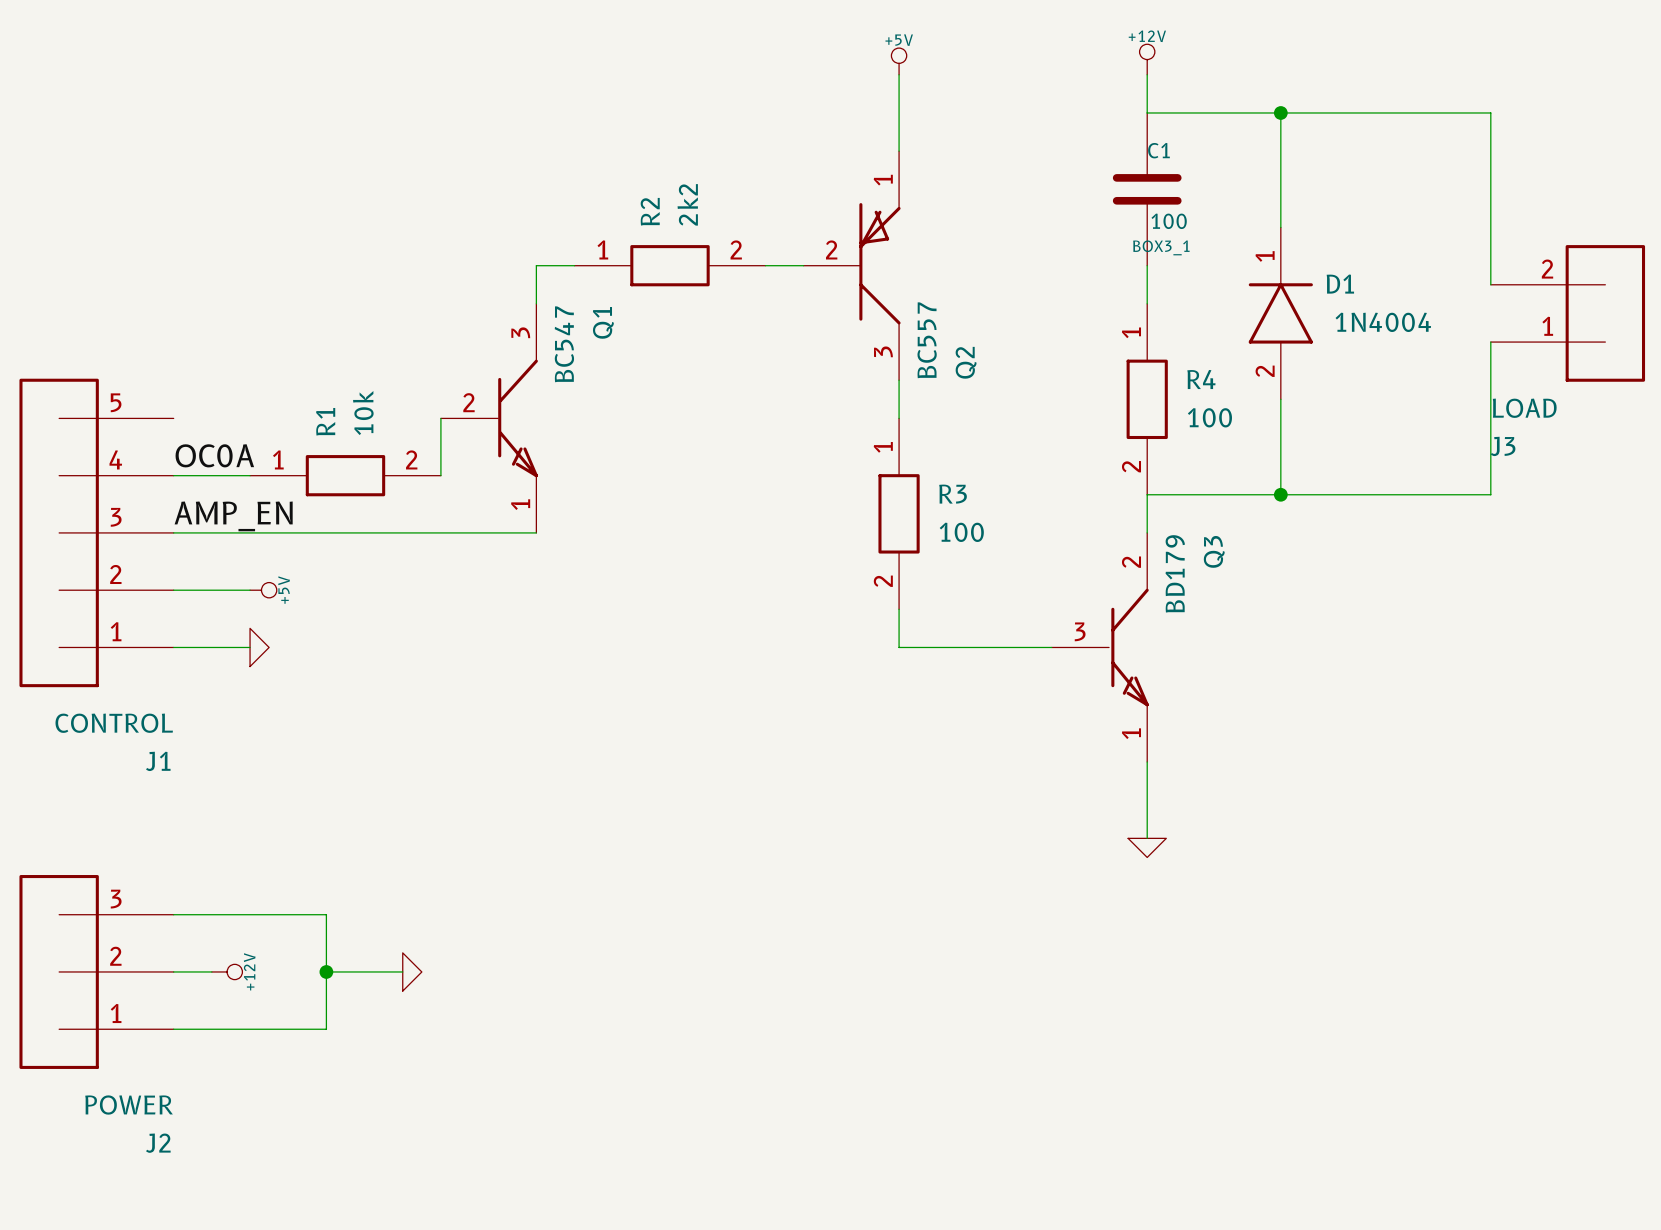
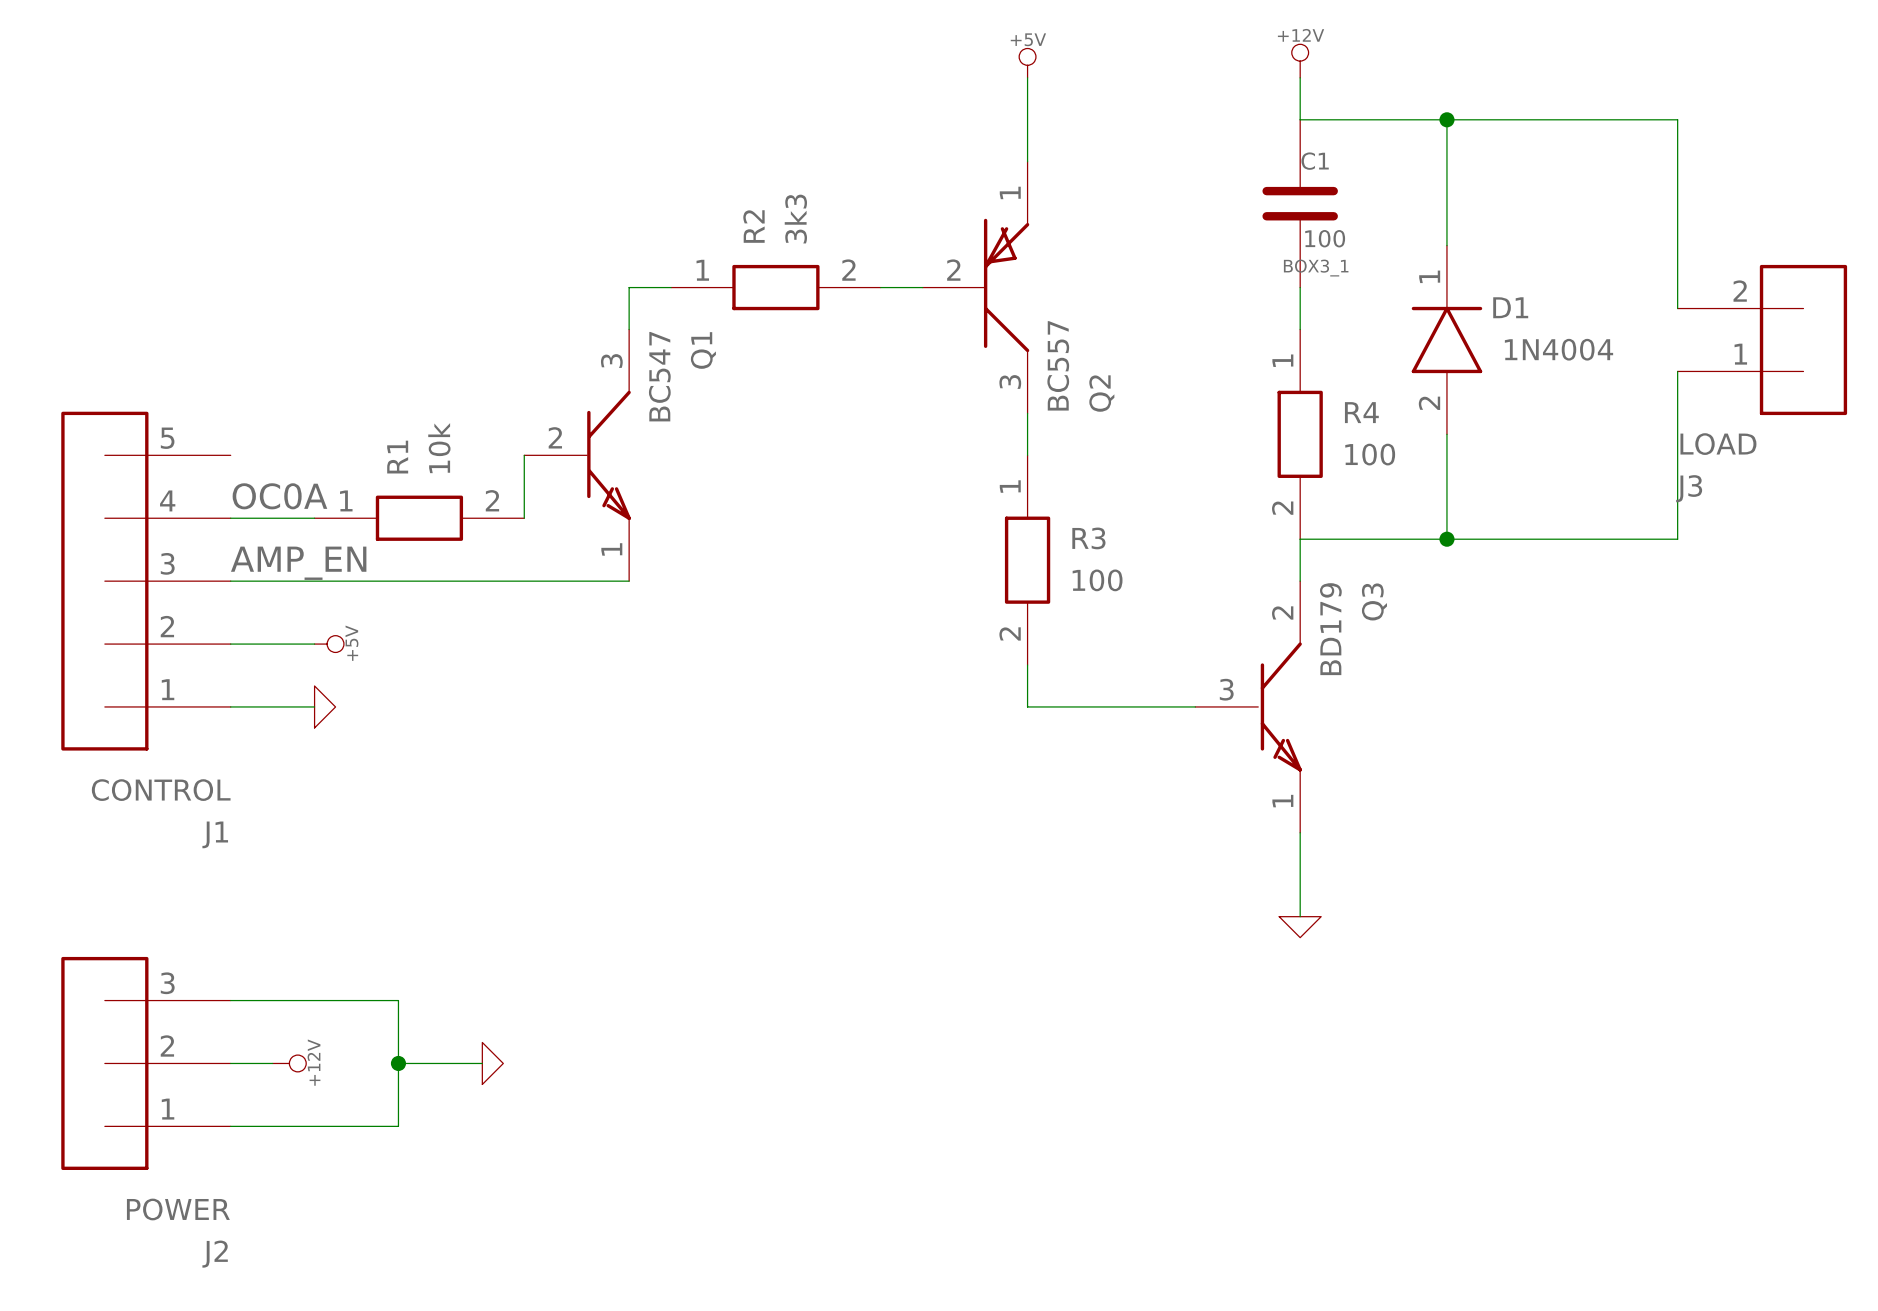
R2 value: 2k2 (687, 204) -> 3k3 (795, 219)

